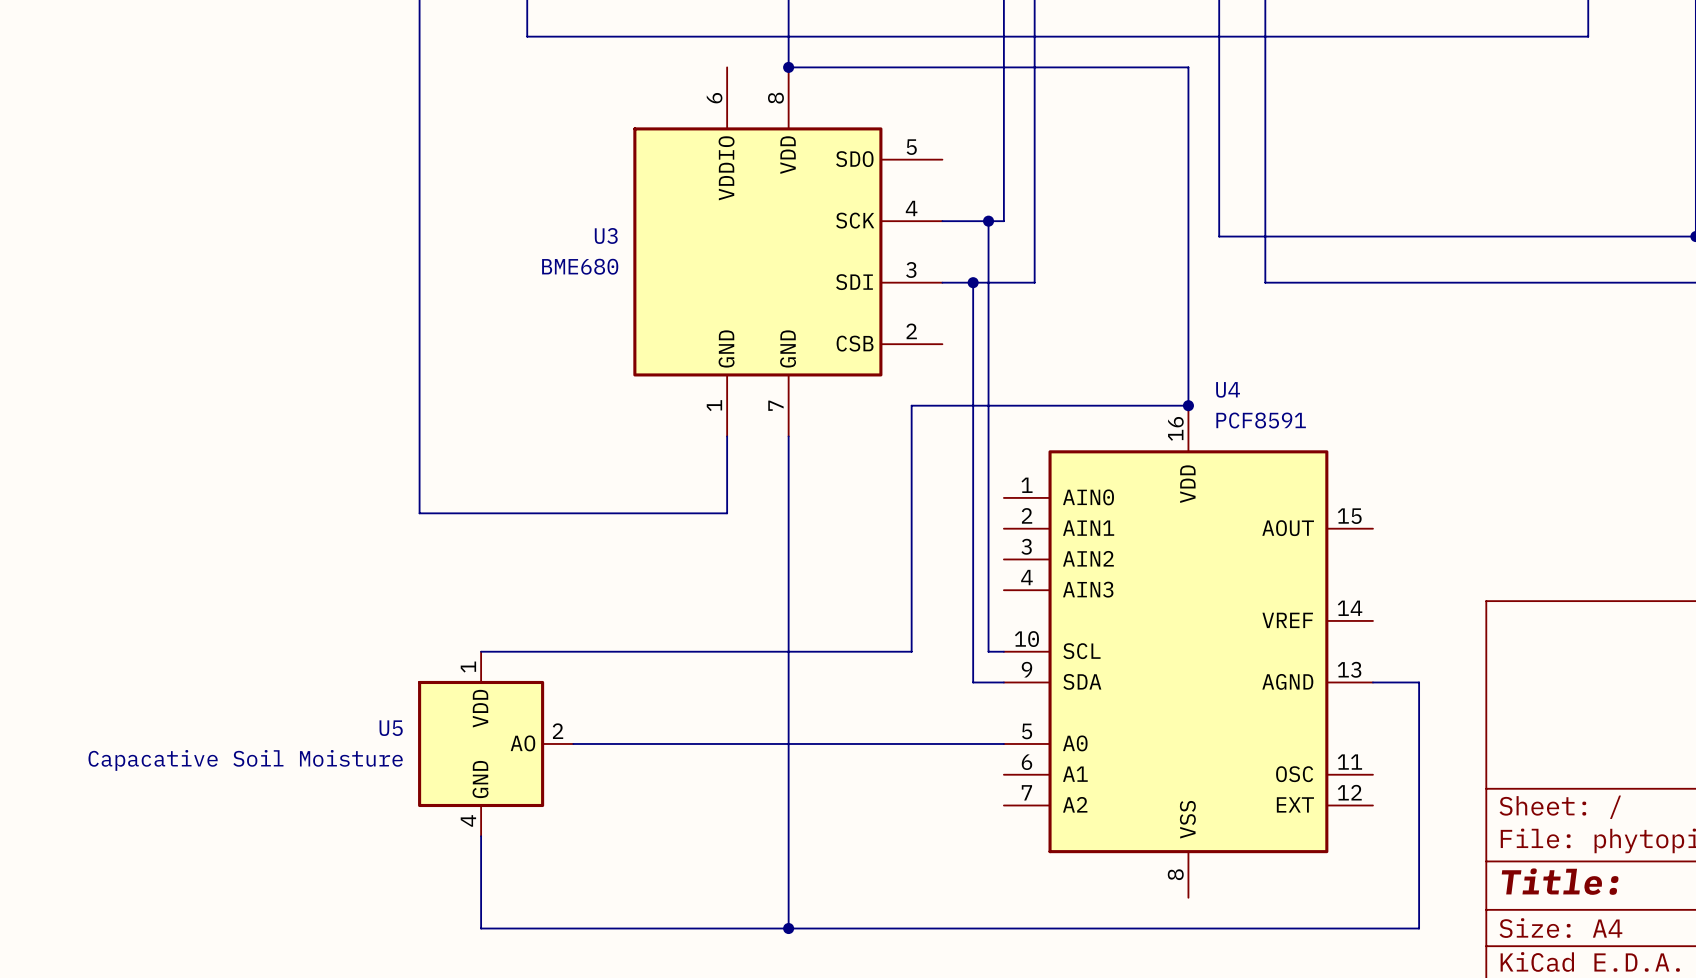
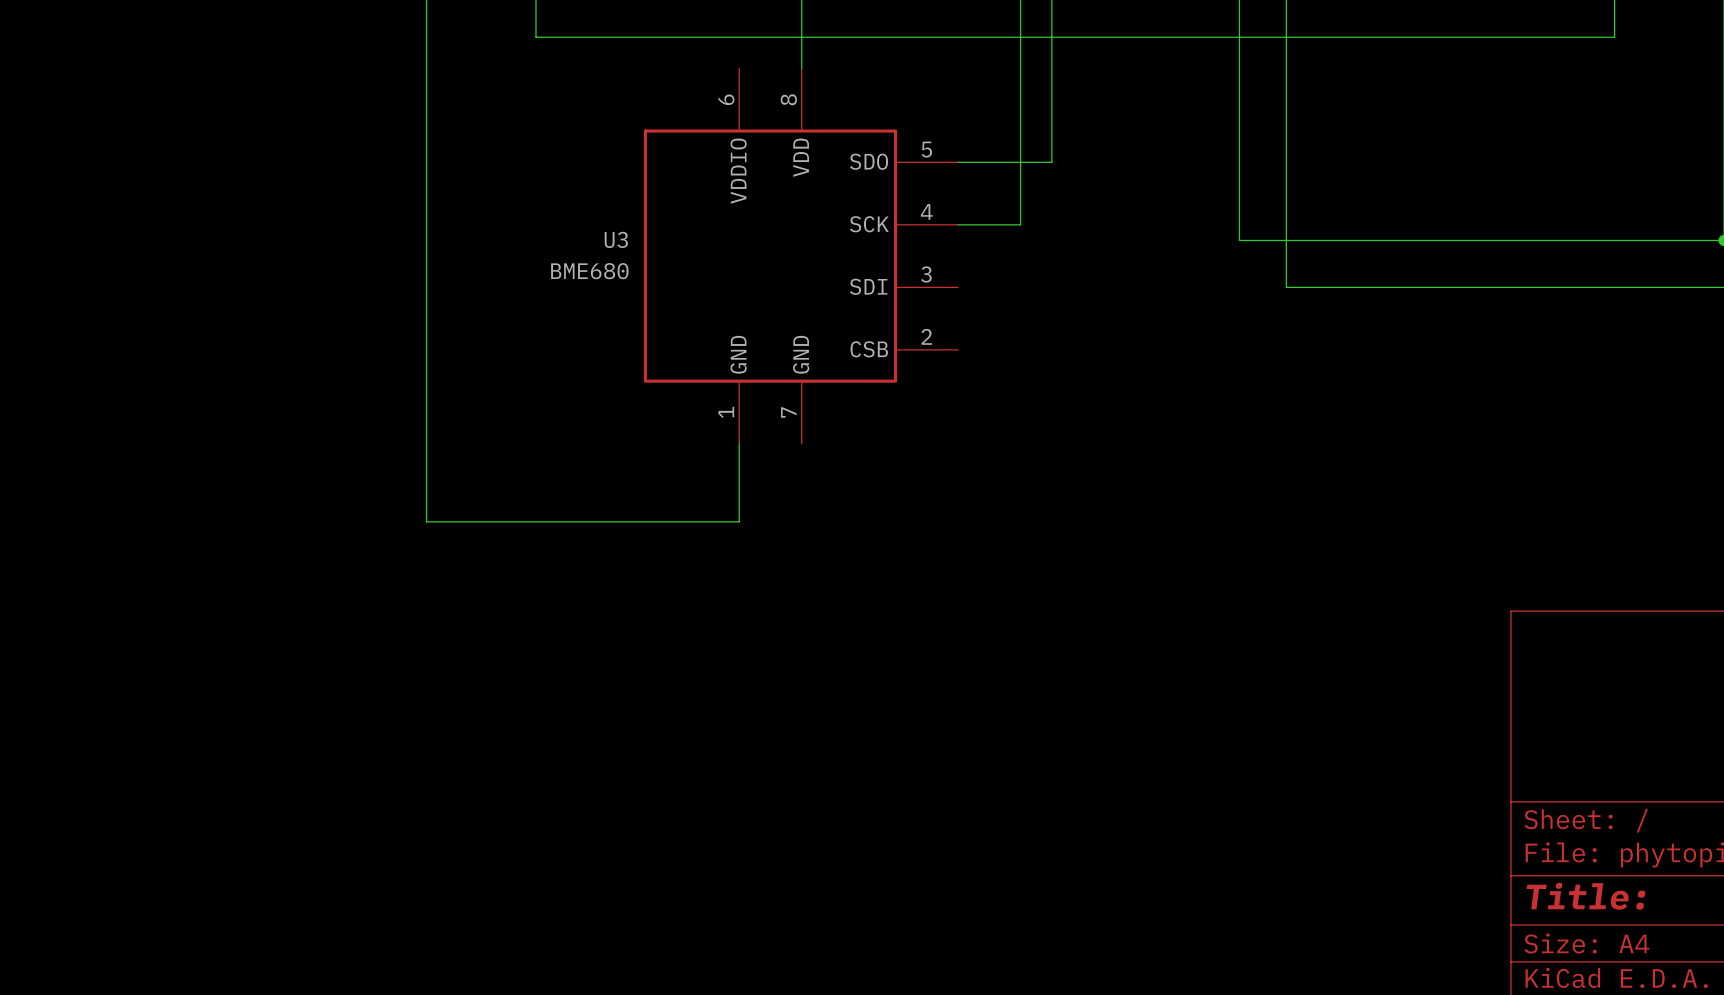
wire: (788, 67) (1188, 67) (1188, 405) (911, 405) (911, 651) (481, 651) -> none
junction: (788, 67) -> none
wire: (1034, 159) (1034, 282) (942, 282) -> (1051, 162) (958, 162)
wire: (988, 221) (988, 651) (1003, 651) -> none
junction: (988, 221) -> none
wire: (973, 282) (973, 682) (1003, 682) -> none
junction: (973, 282) -> none
junction: (1188, 405) -> none
wire: (788, 436) (788, 928) -> none
U4: PCF8591 (1188, 651) -> none
wire: (1372, 682) (1419, 682) (1419, 928) (481, 928) (481, 836) -> none
U5: Capacative Soil Moisture (495, 743) -> none
wire: (573, 743) (1003, 743) -> none
junction: (788, 928) -> none

